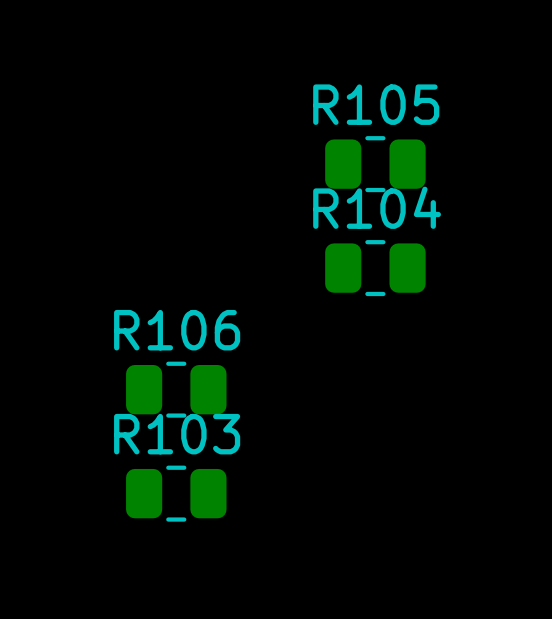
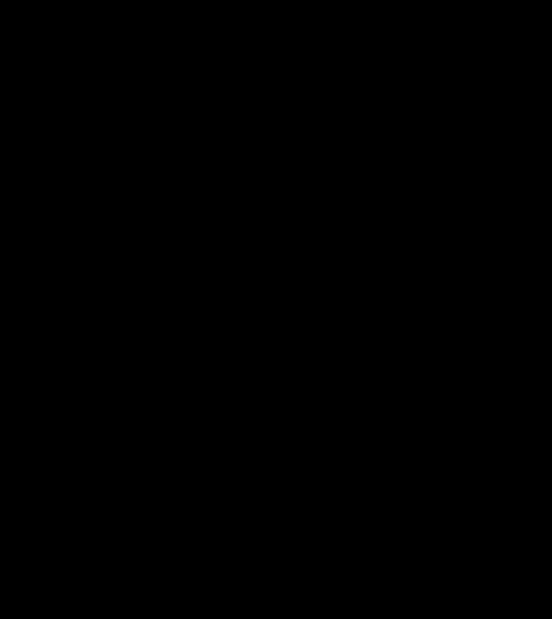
R105: (375, 164) -> none
R104: (375, 268) -> none
R106: (176, 389) -> none
R103: (176, 493) -> none

